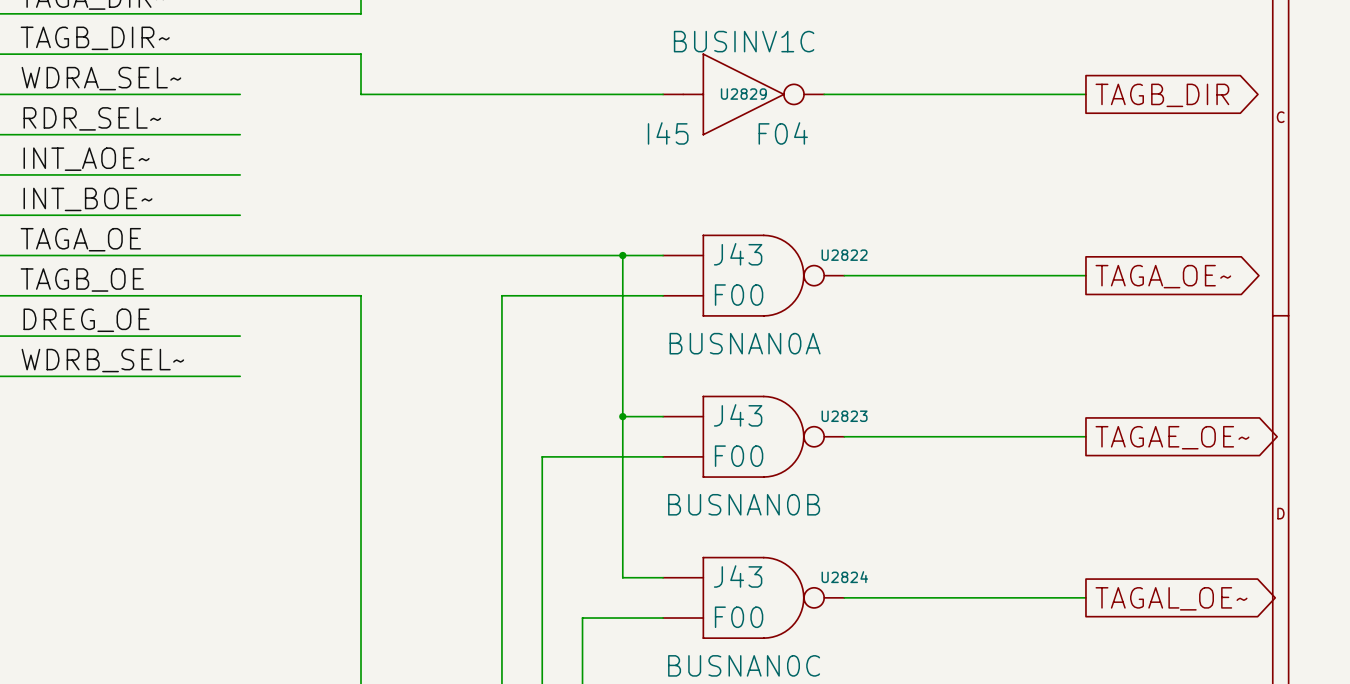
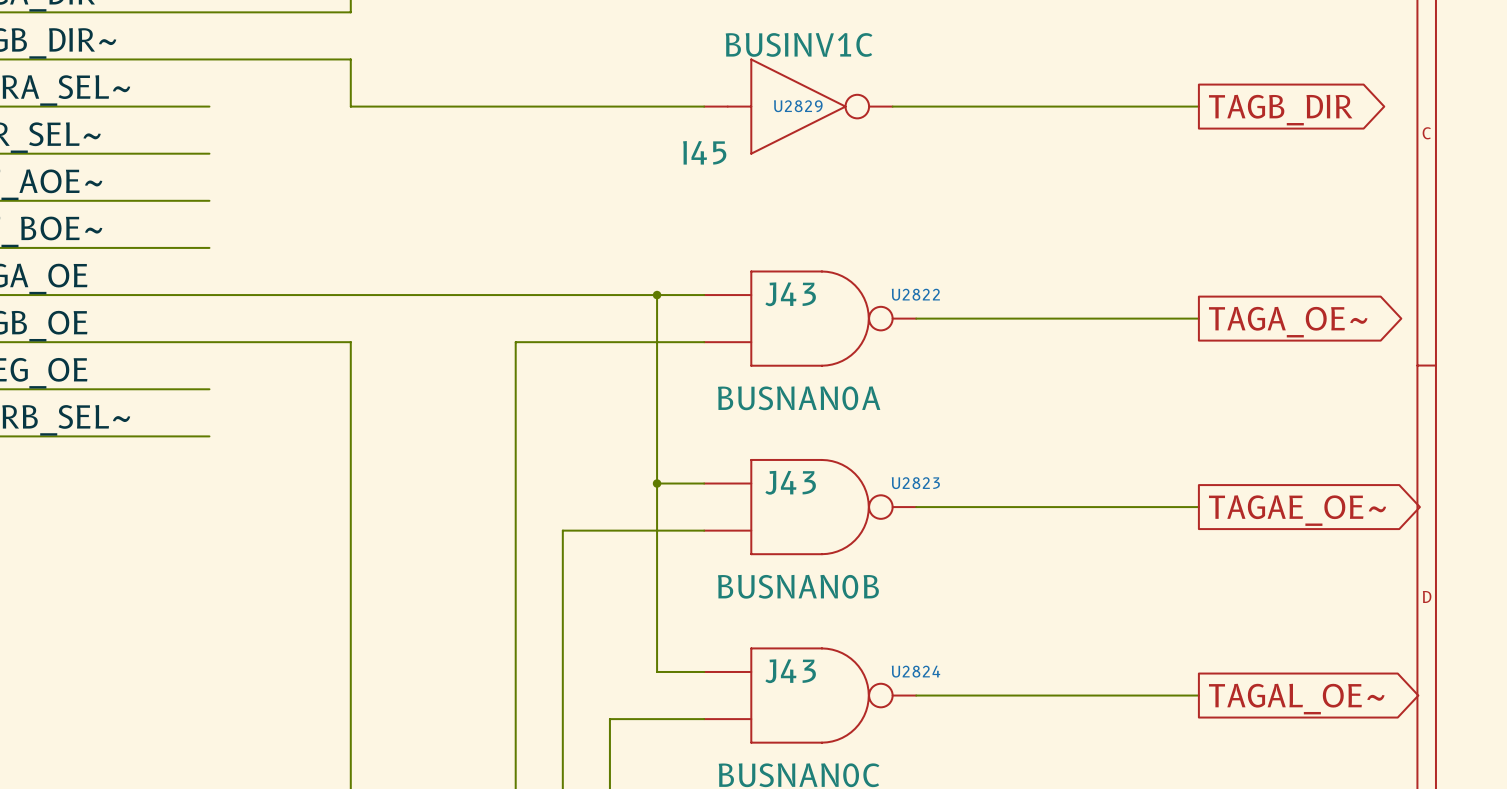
U2829 value: F04 (783, 133) -> none
U2822 value: F00 (739, 295) -> none
U2823 value: F00 (739, 456) -> none
U2824 value: F00 (739, 617) -> none

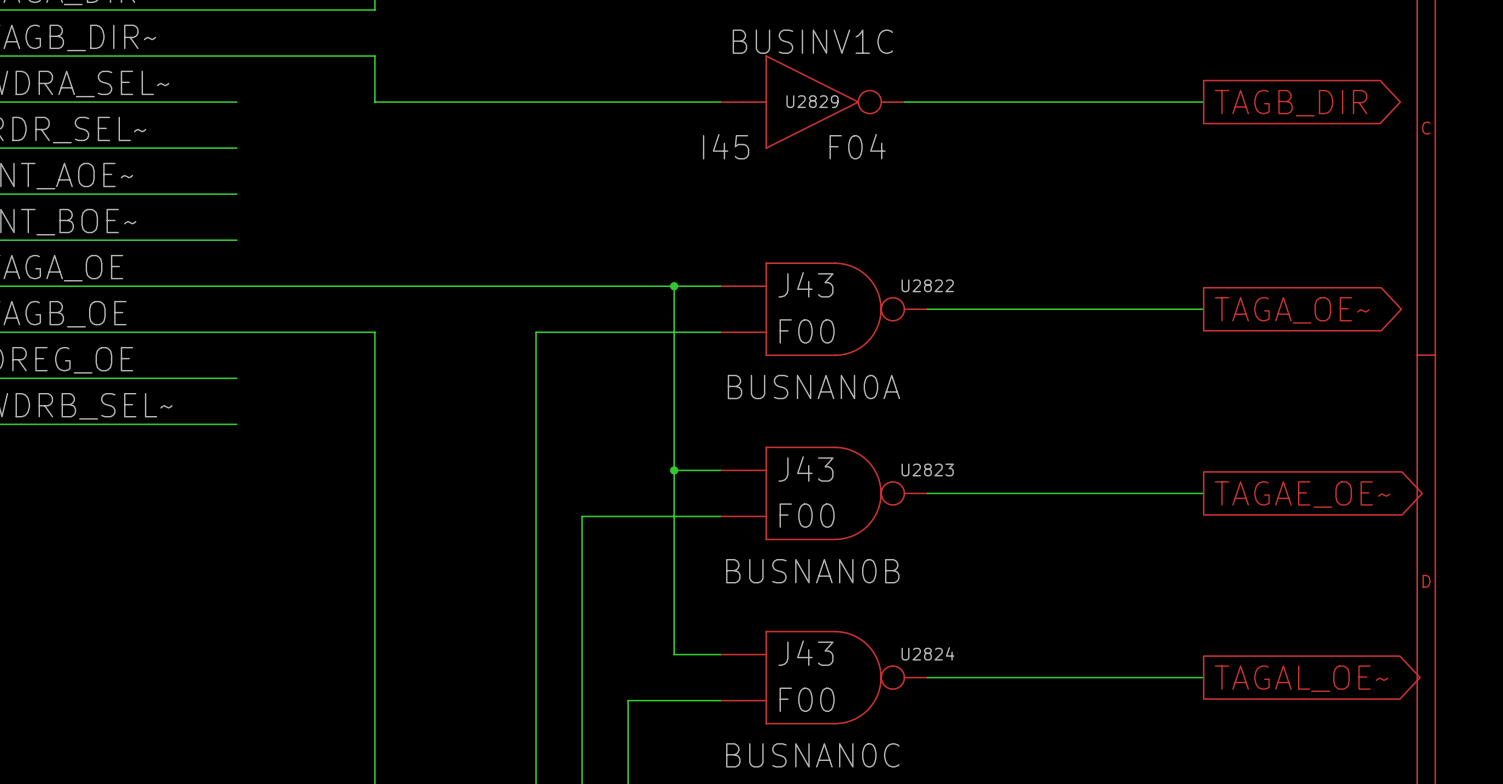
U2829 value: none -> F04 (857, 146)
U2822 value: none -> F00 (807, 331)
U2823 value: none -> F00 (807, 515)
U2824 value: none -> F00 (807, 699)

